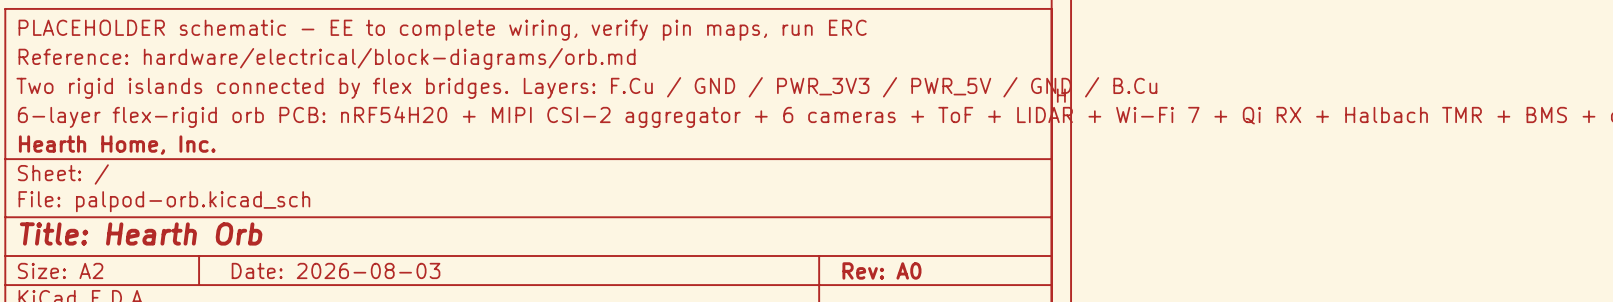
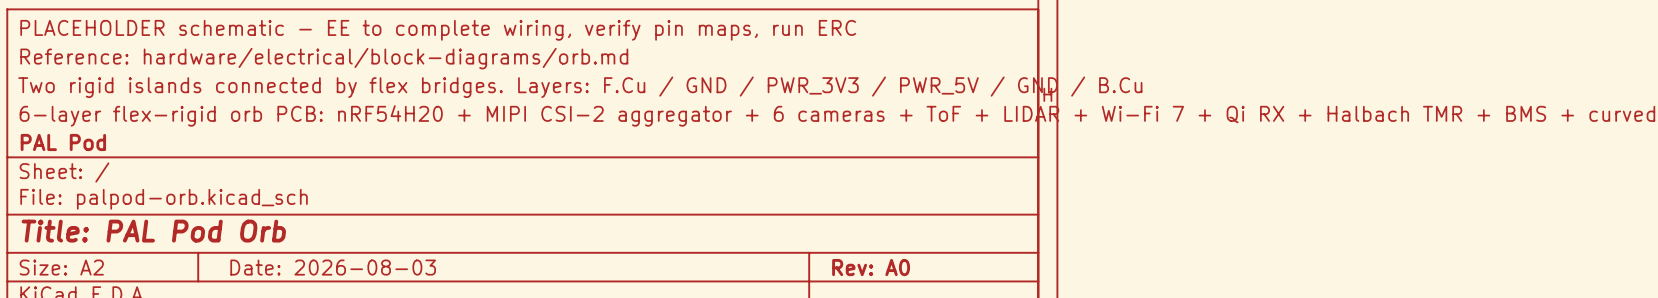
title block: Hearth Home, Inc. (117, 145) -> PAL Pod (63, 142)
title block: Title: Hearth Orb (141, 233) -> Title: PAL Pod Orb (153, 231)

